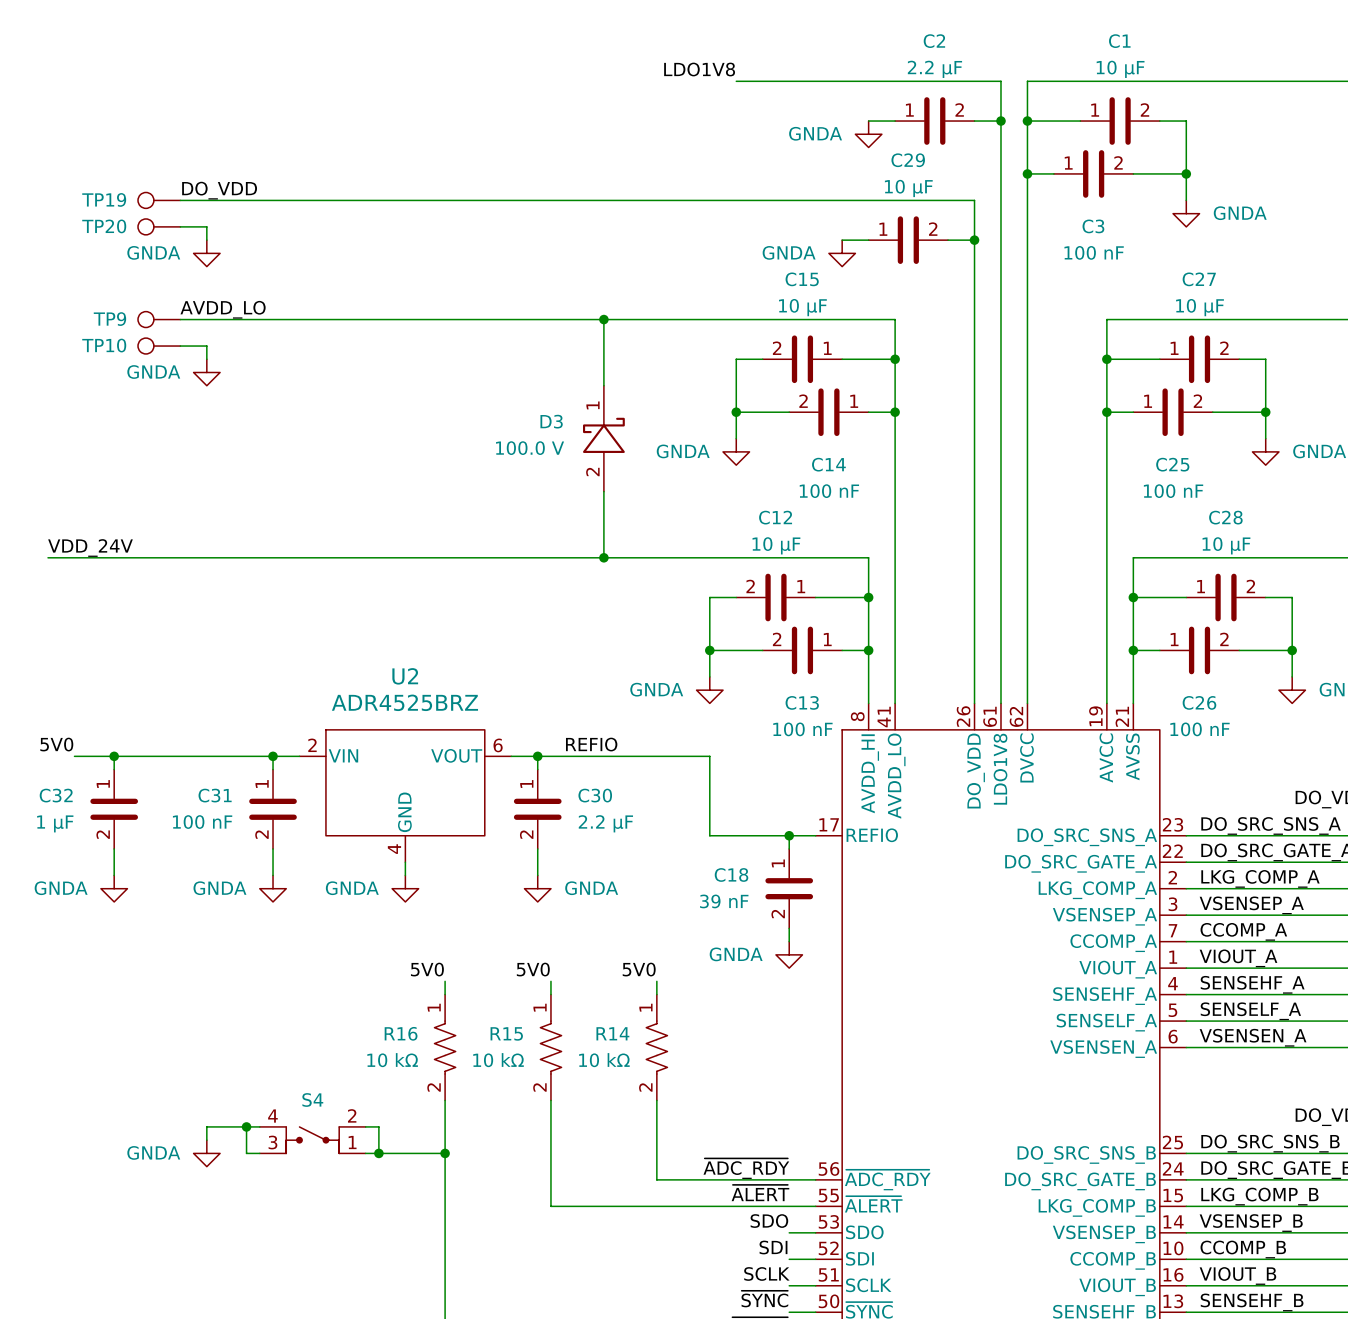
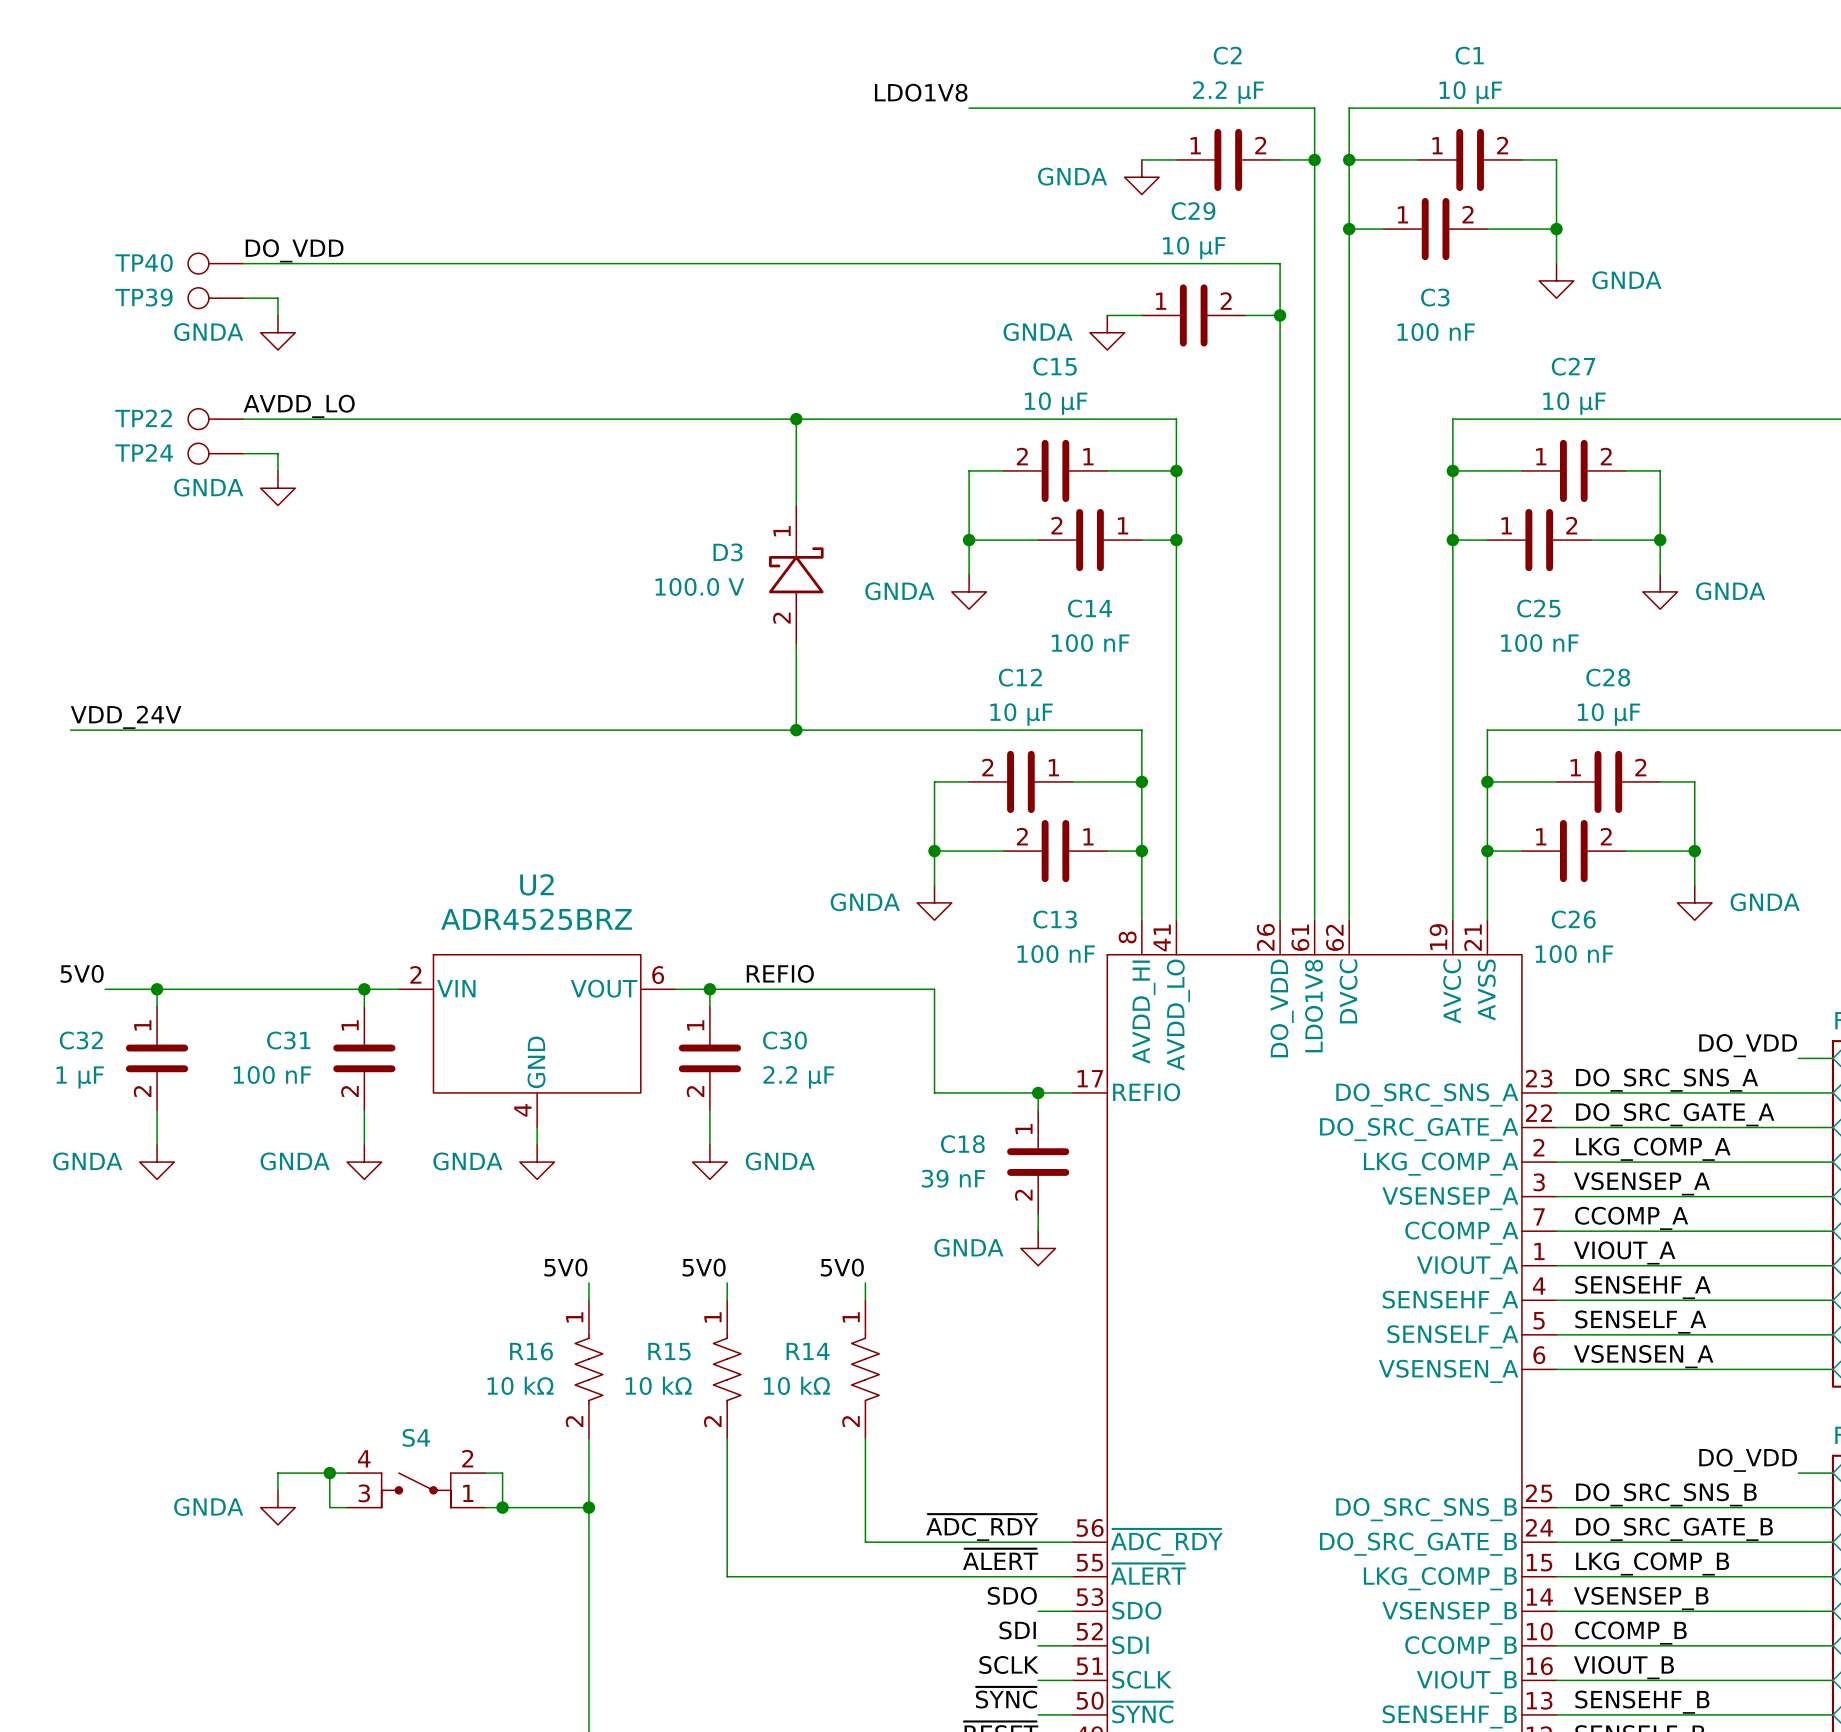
TP19 name: TP19 (104, 199) -> TP40 (144, 262)
TP20 name: TP20 (104, 226) -> TP39 (143, 297)
TP9 name: TP9 (109, 319) -> TP22 (143, 418)
TP10 name: TP10 (104, 345) -> TP24 (144, 452)

